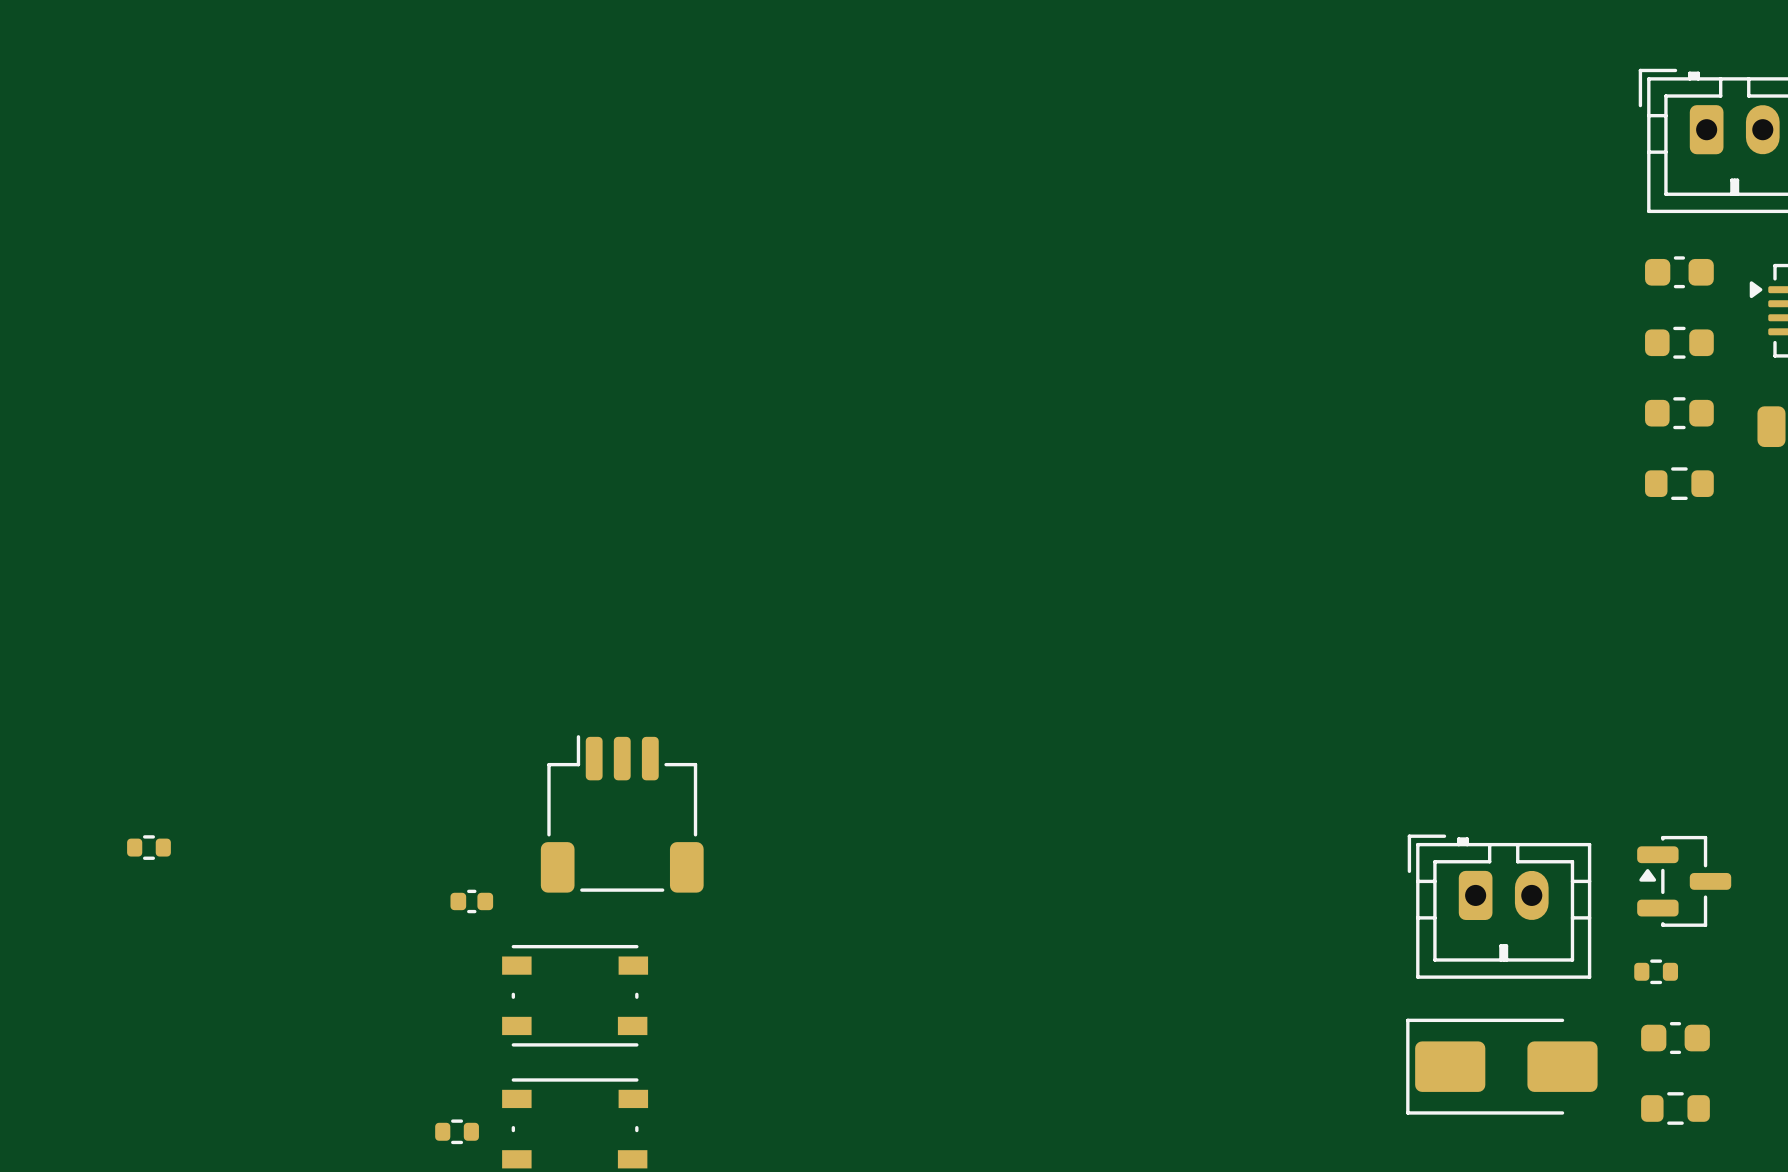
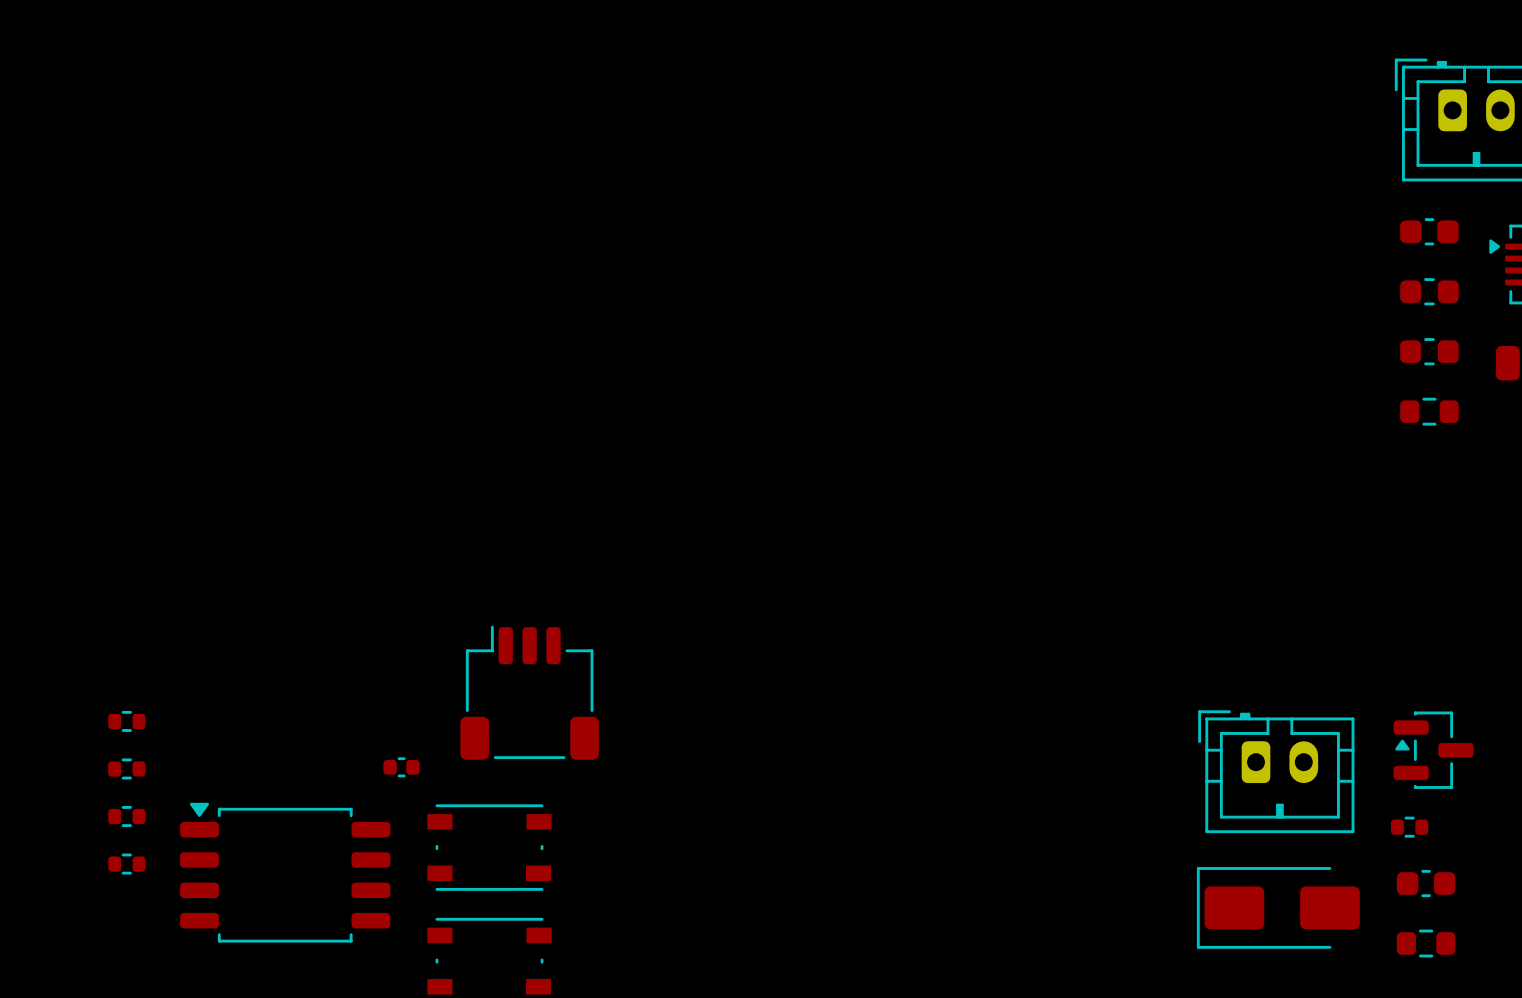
part: none -> (126, 768)
part: none -> (126, 816)
part: none -> (126, 864)
part: none -> (285, 872)
part: (457, 1131) -> none

